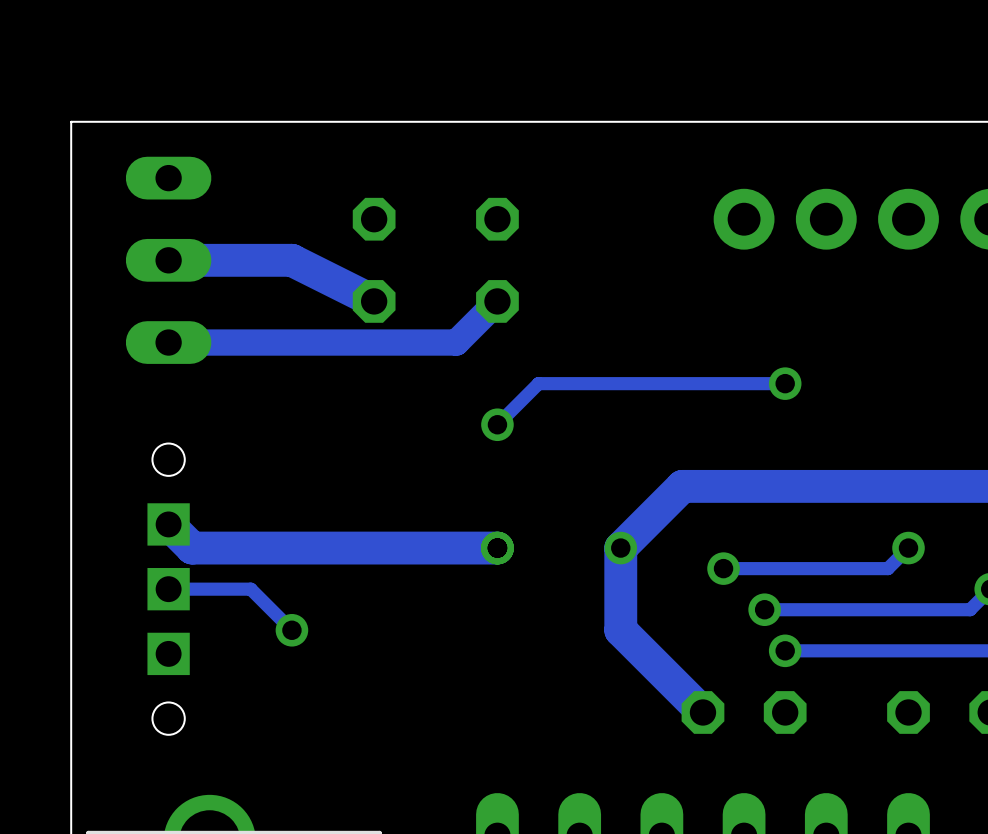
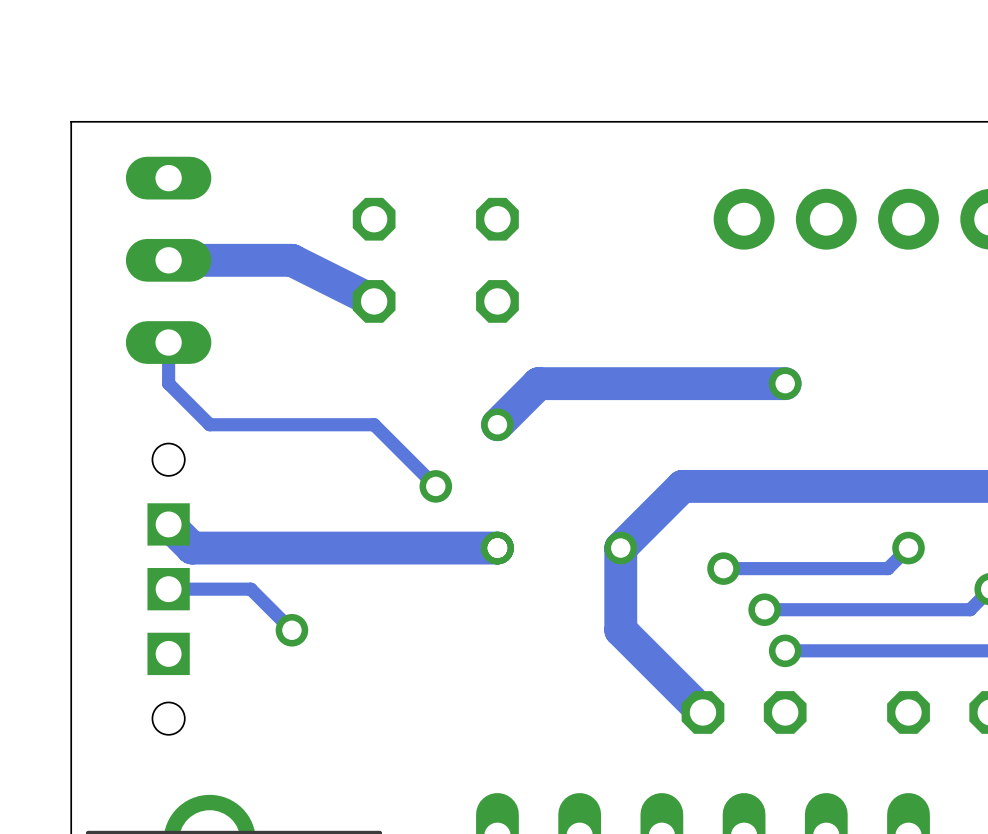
track: (497, 301) (456, 342) (168, 342) -> (435, 486) (374, 424) (209, 424) (168, 383) (168, 342)
track width: thin (785, 383) (538, 383) (497, 424) -> thick (785, 383) (538, 383) (497, 424)
via: none -> (435, 486)

